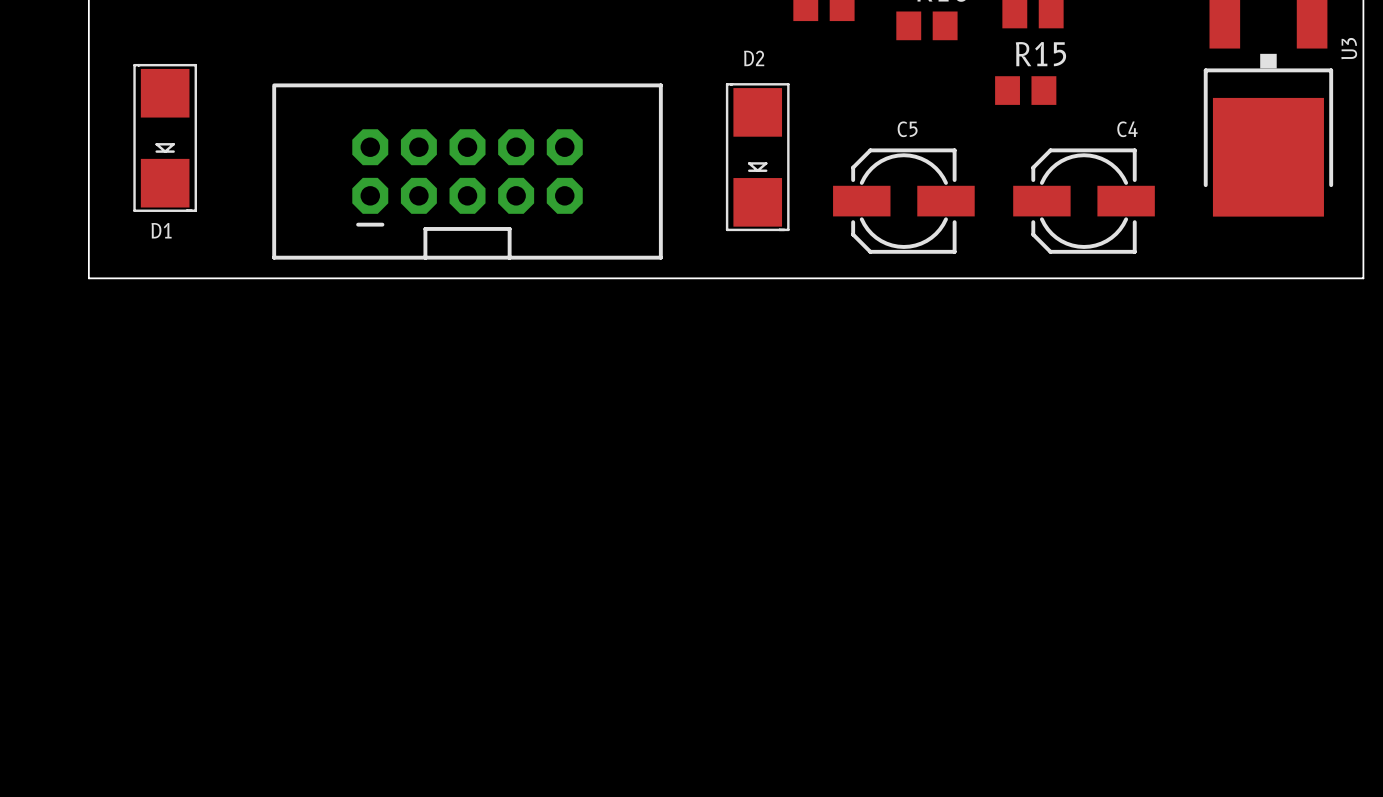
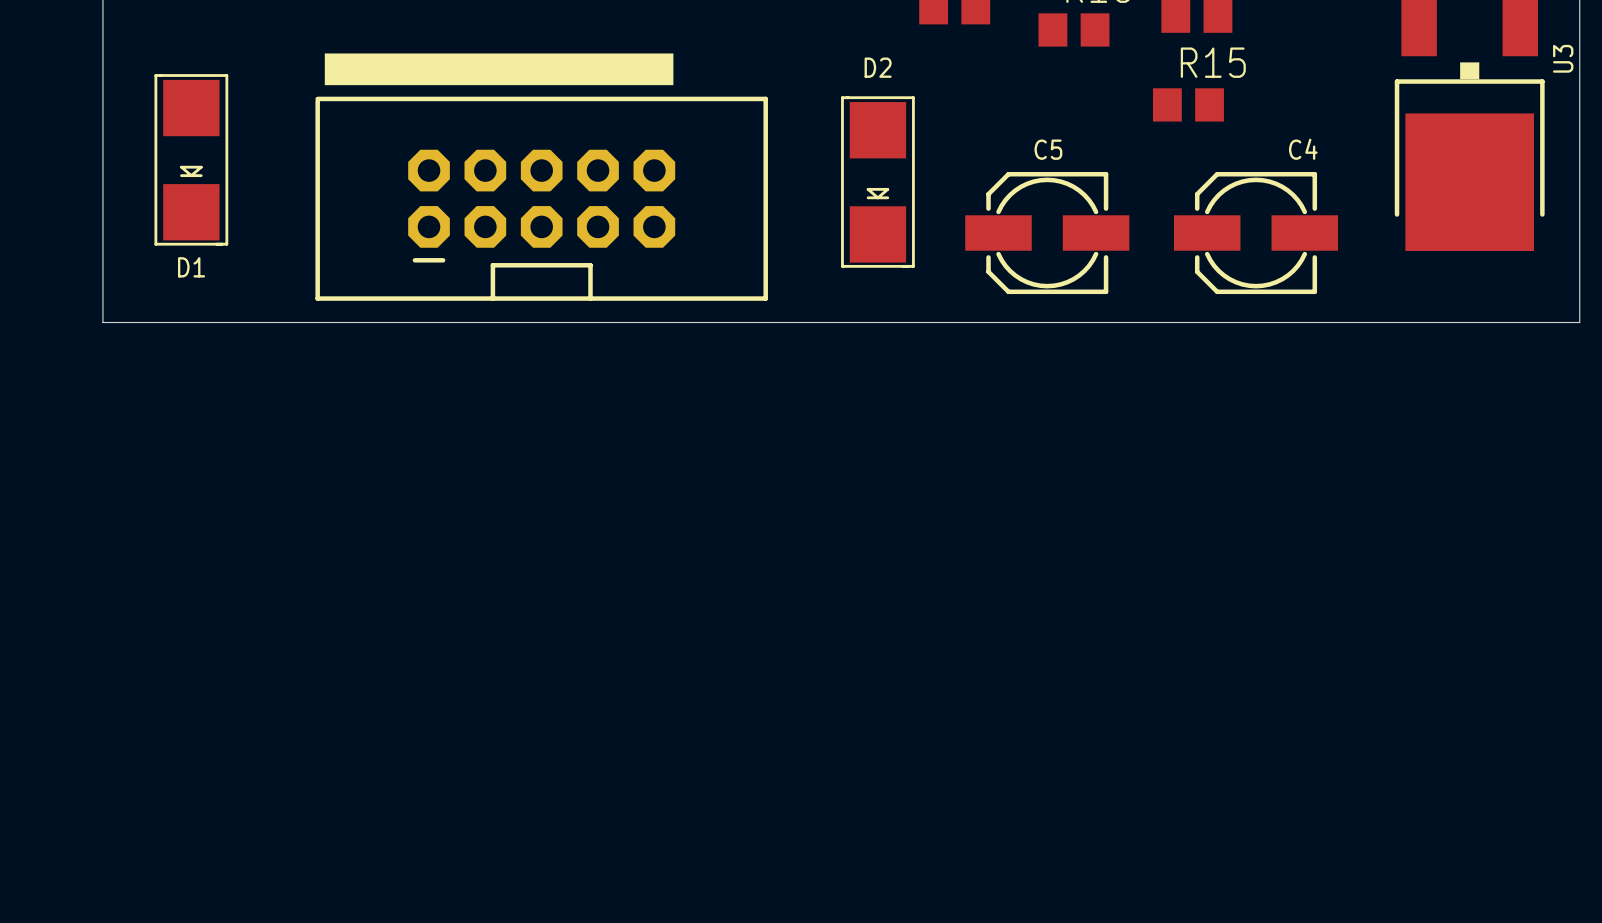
drawing: none -> [324, 53, 674, 86]

